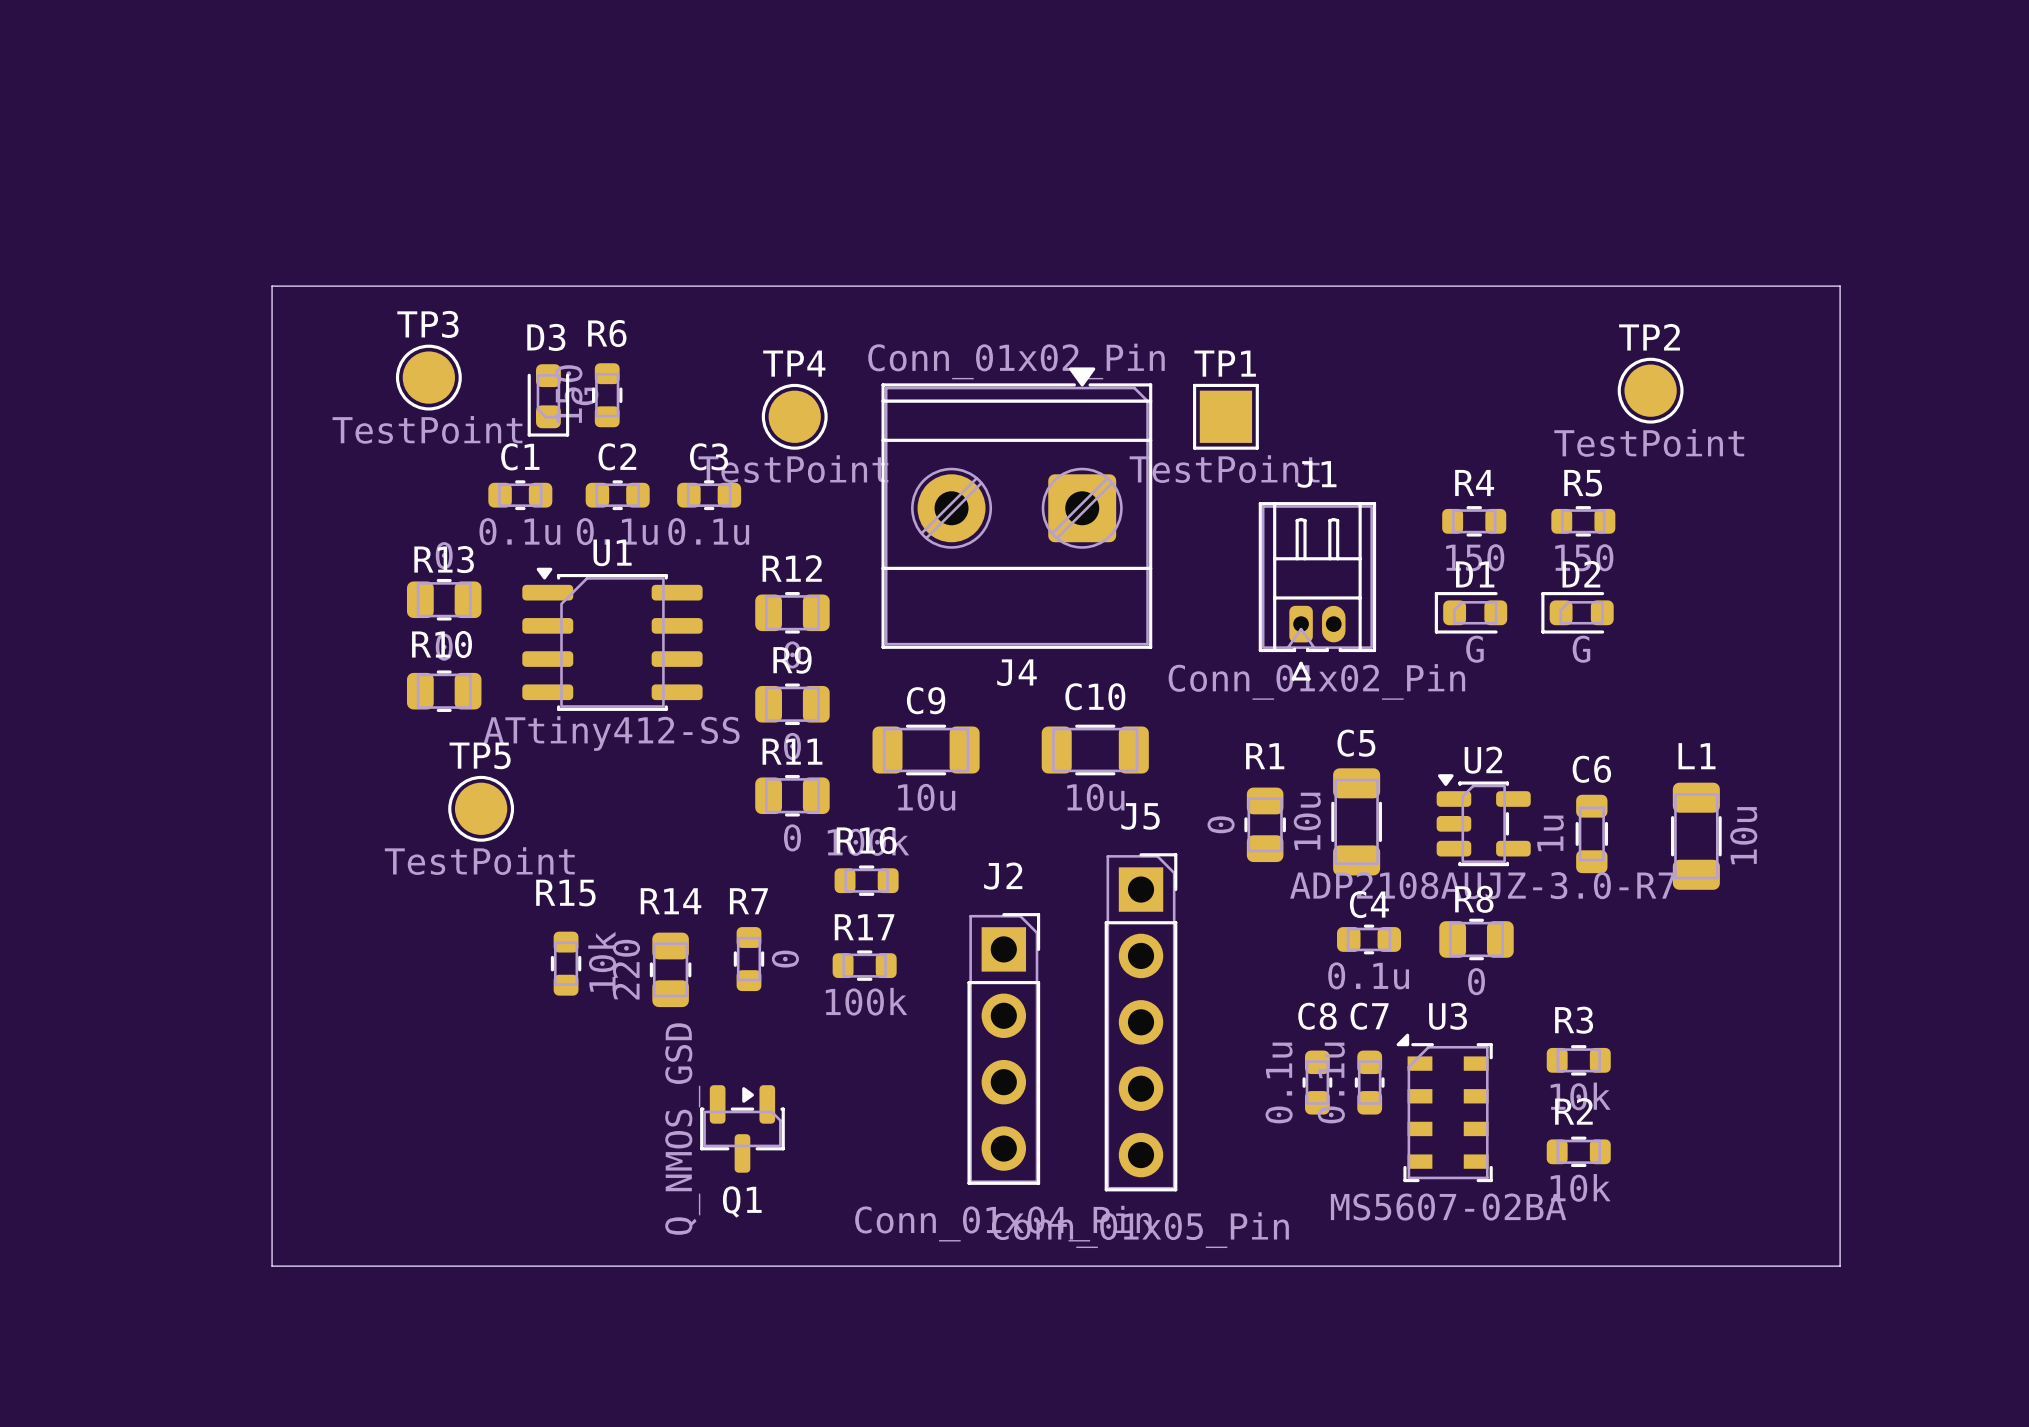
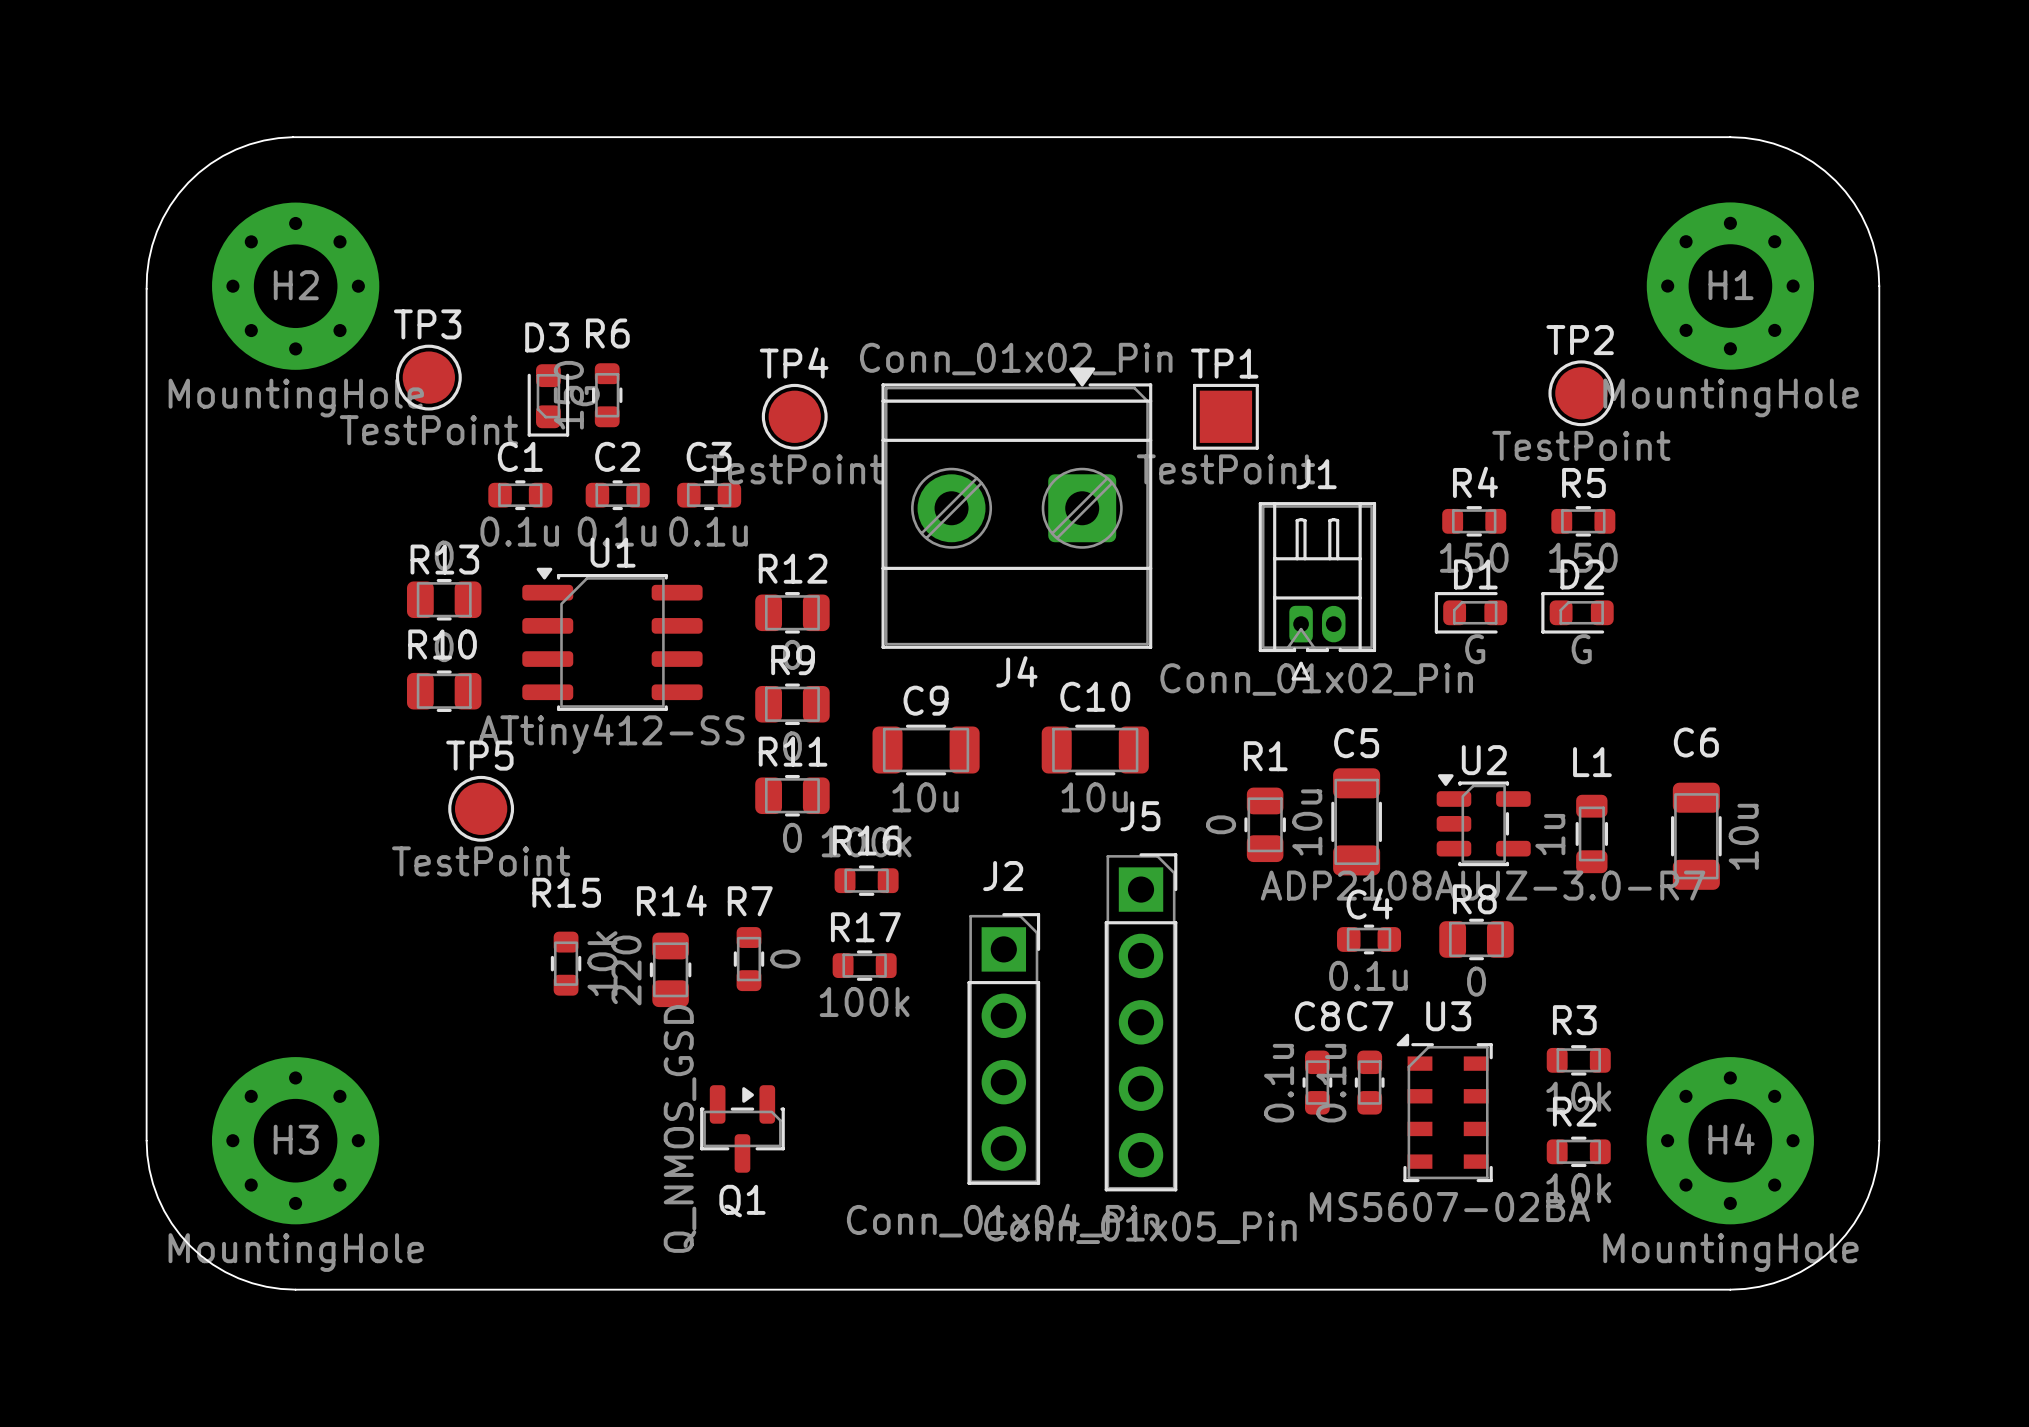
board edge: (272, 286) (1840, 286) (1840, 1266) (272, 1266) (272, 286) -> (292, 137) (249, 144) (223, 156) (199, 172) (178, 193) (162, 218) (152, 245) (147, 274) (147, 1155) (153, 1183) (164, 1210) (190, 1246) (212, 1264) (252, 1283) (295, 1289) (1730, 1289) (1773, 1283) (1800, 1272) (1824, 1255) (1854, 1223) (1872, 1183) (1879, 1140) (1879, 286) (1876, 257) (1861, 215) (1845, 191) (1813, 162) (1773, 143) (1730, 137) (292, 137)
H2: none -> MountingHole (295, 286)
H1: none -> MountingHole (1730, 286)
TP2 position: (1650, 390) -> (1581, 393)
L1 name position: L1 (1697, 756) -> L1 (1592, 762)
C6 name position: C6 (1591, 769) -> C6 (1696, 742)
H3: none -> MountingHole (295, 1140)
H4: none -> MountingHole (1730, 1140)

